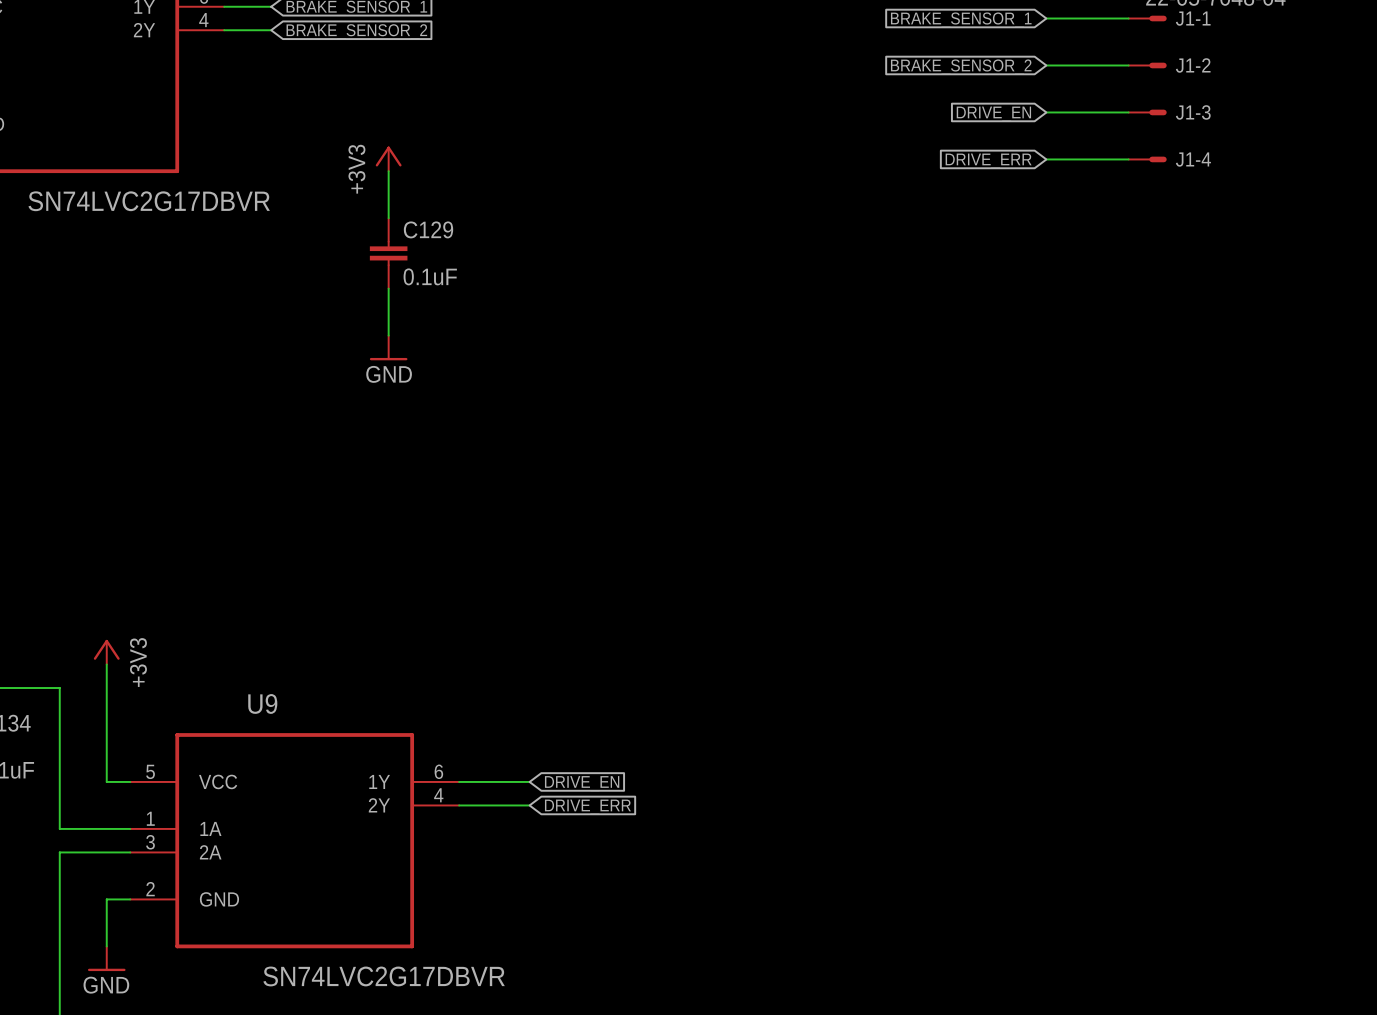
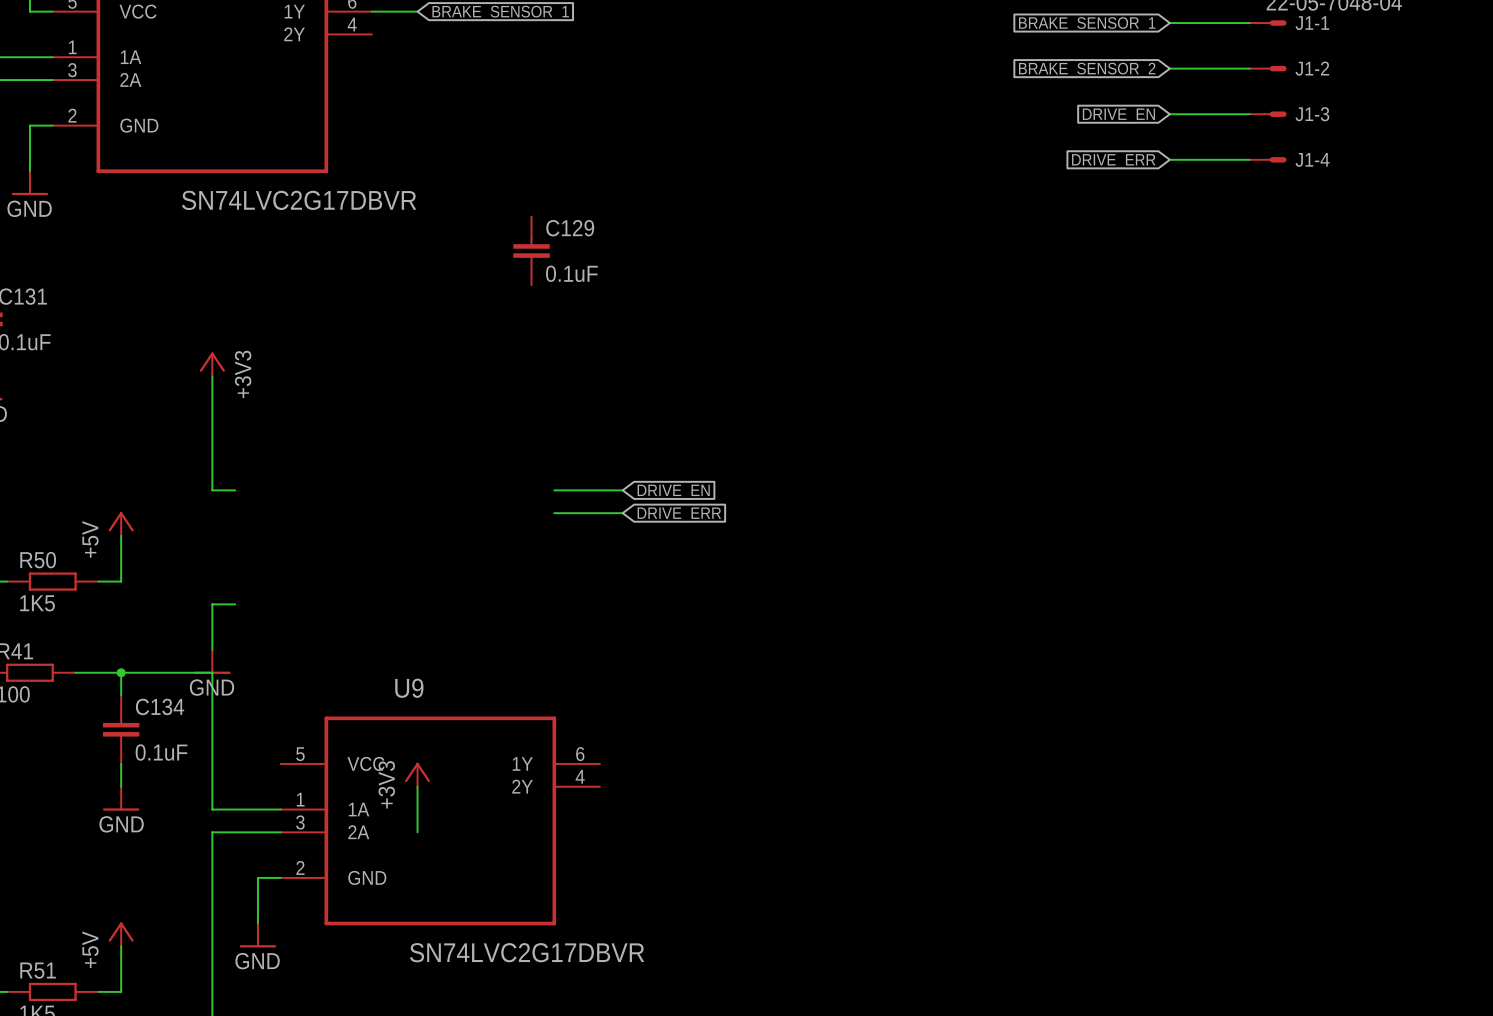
wire: (224, 30) (271, 30) -> none
global label: BRAKE_SENSOR_2 (356, 31) -> none
power symbol: +3V3 (388, 158) -> none
wire: (388, 171) (388, 218) -> none
wire: (388, 288) (388, 335) -> none
power symbol: GND (388, 347) -> none
power symbol: none -> +3V3 (212, 364)
wire: none -> (212, 376) (212, 490) (235, 490)
wire: none -> (554, 490) (622, 490)
global label: none -> DRIVE_EN (673, 492)
wire: none -> (554, 513) (622, 513)
global label: none -> DRIVE_ERR (679, 514)
wire: none -> (235, 604) (212, 604) (212, 649)
power symbol: +3V3 (106, 652) -> none
wire: (106, 664) (106, 781) (130, 781) -> none
power symbol: none -> GND (212, 661)
wire: (459, 781) (529, 781) -> none
global label: DRIVE_EN (582, 783) -> none
power symbol: none -> +3V3 (417, 774)
wire: none -> (417, 786) (417, 832)
wire: (459, 805) (529, 805) -> none
global label: DRIVE_ERR (587, 807) -> none

